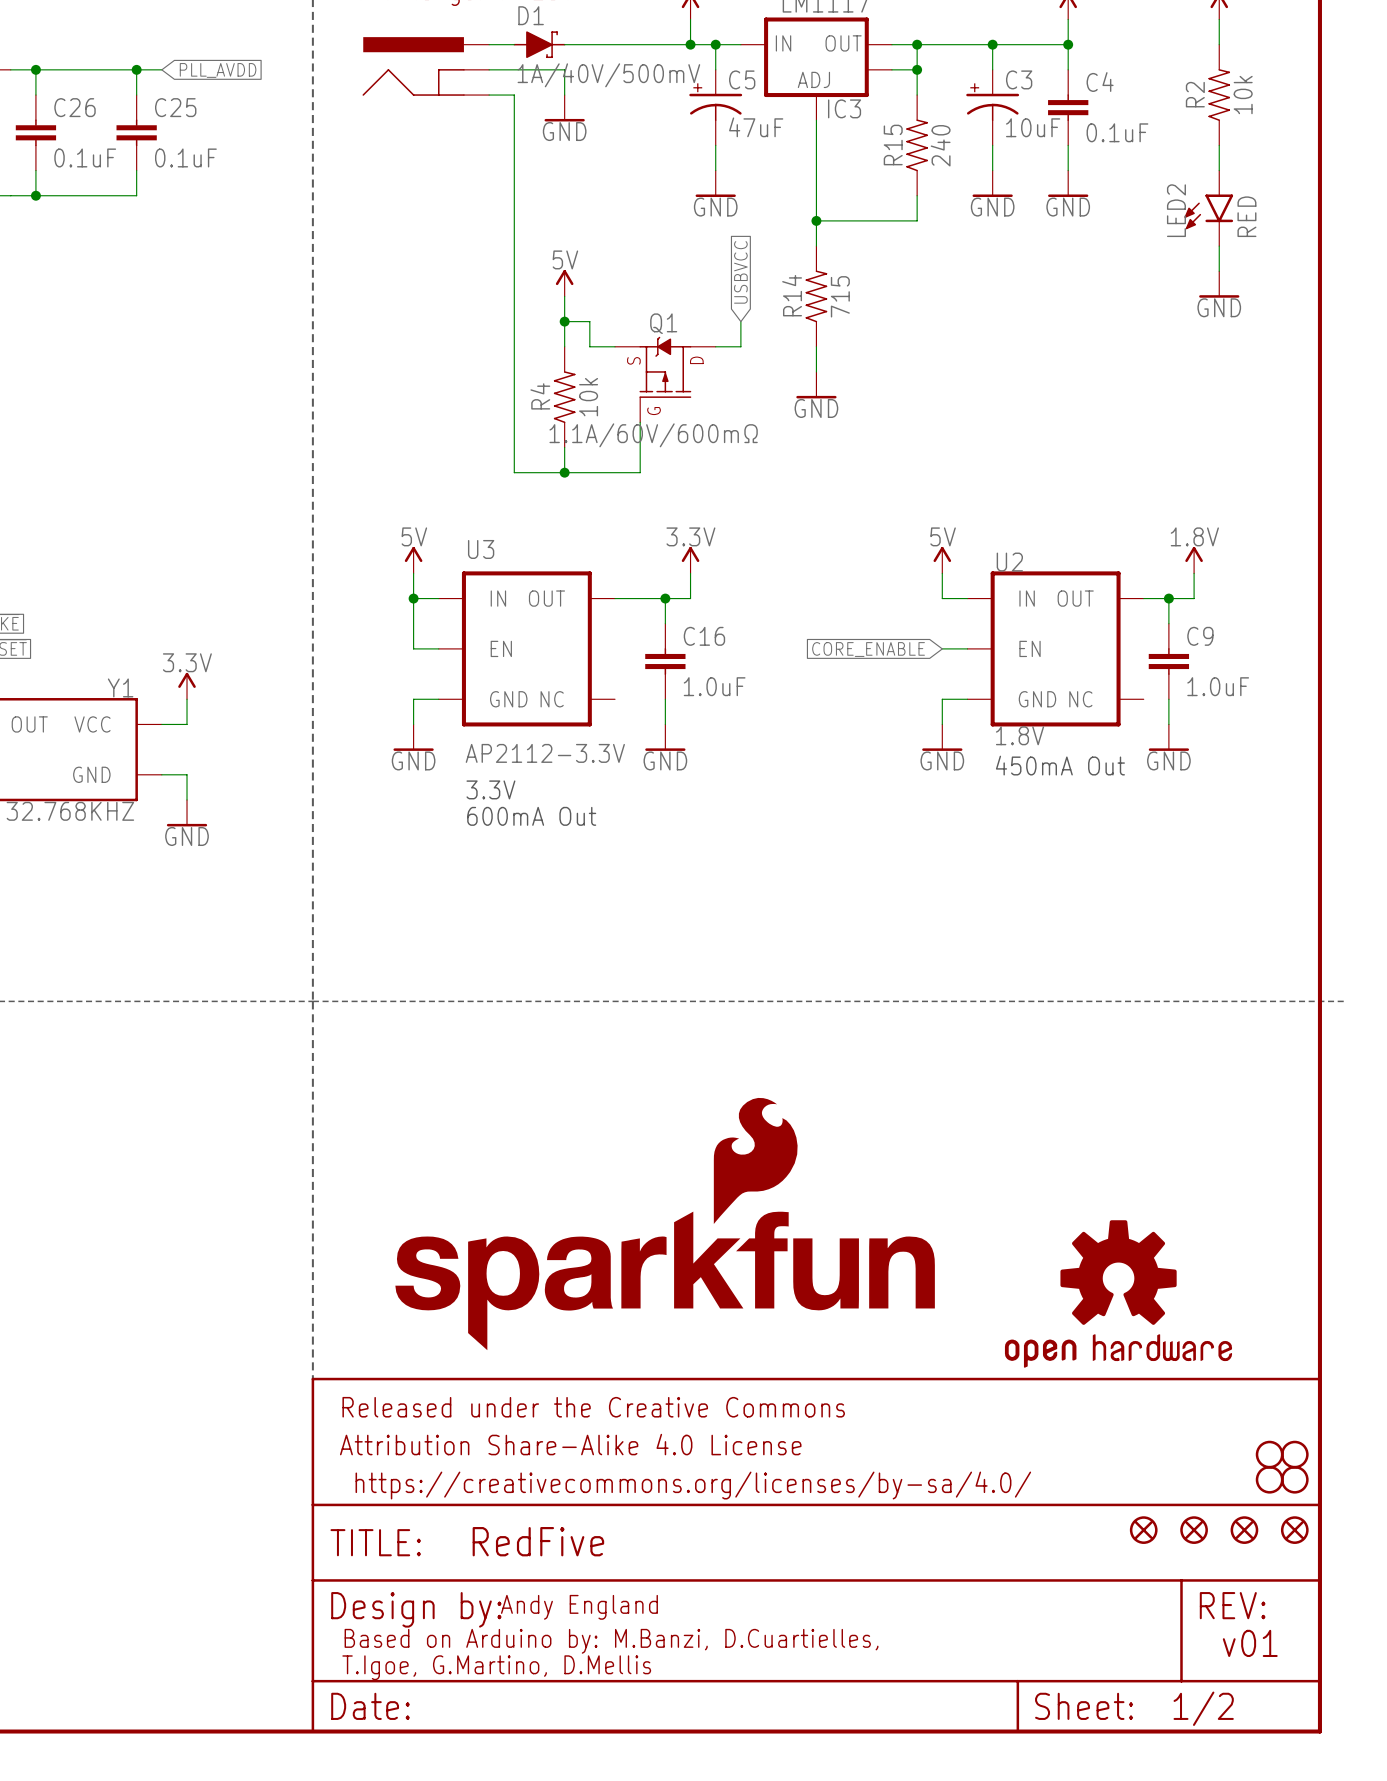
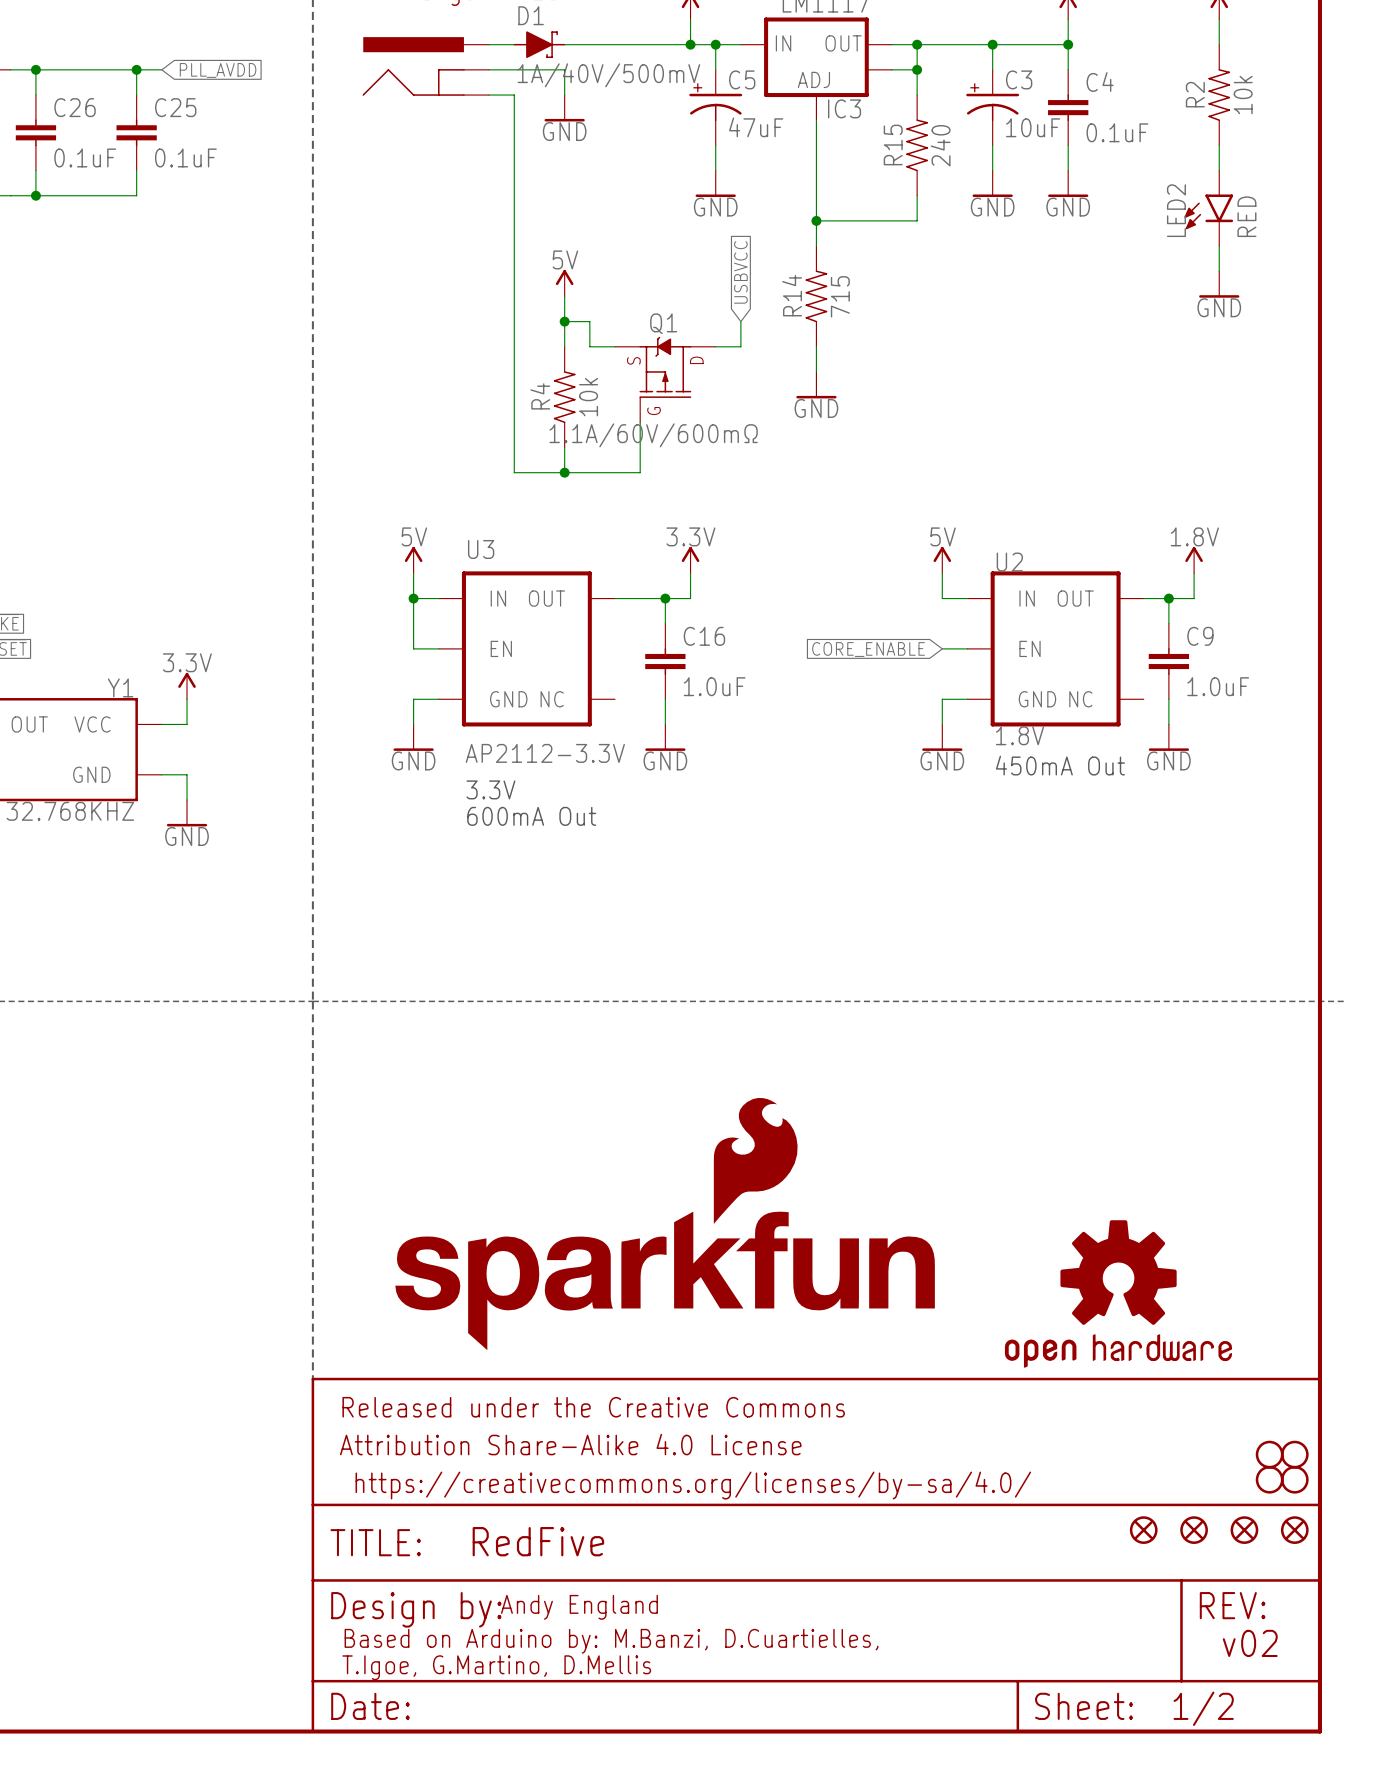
text: v01 (1250, 1643) -> v02 (1250, 1643)

